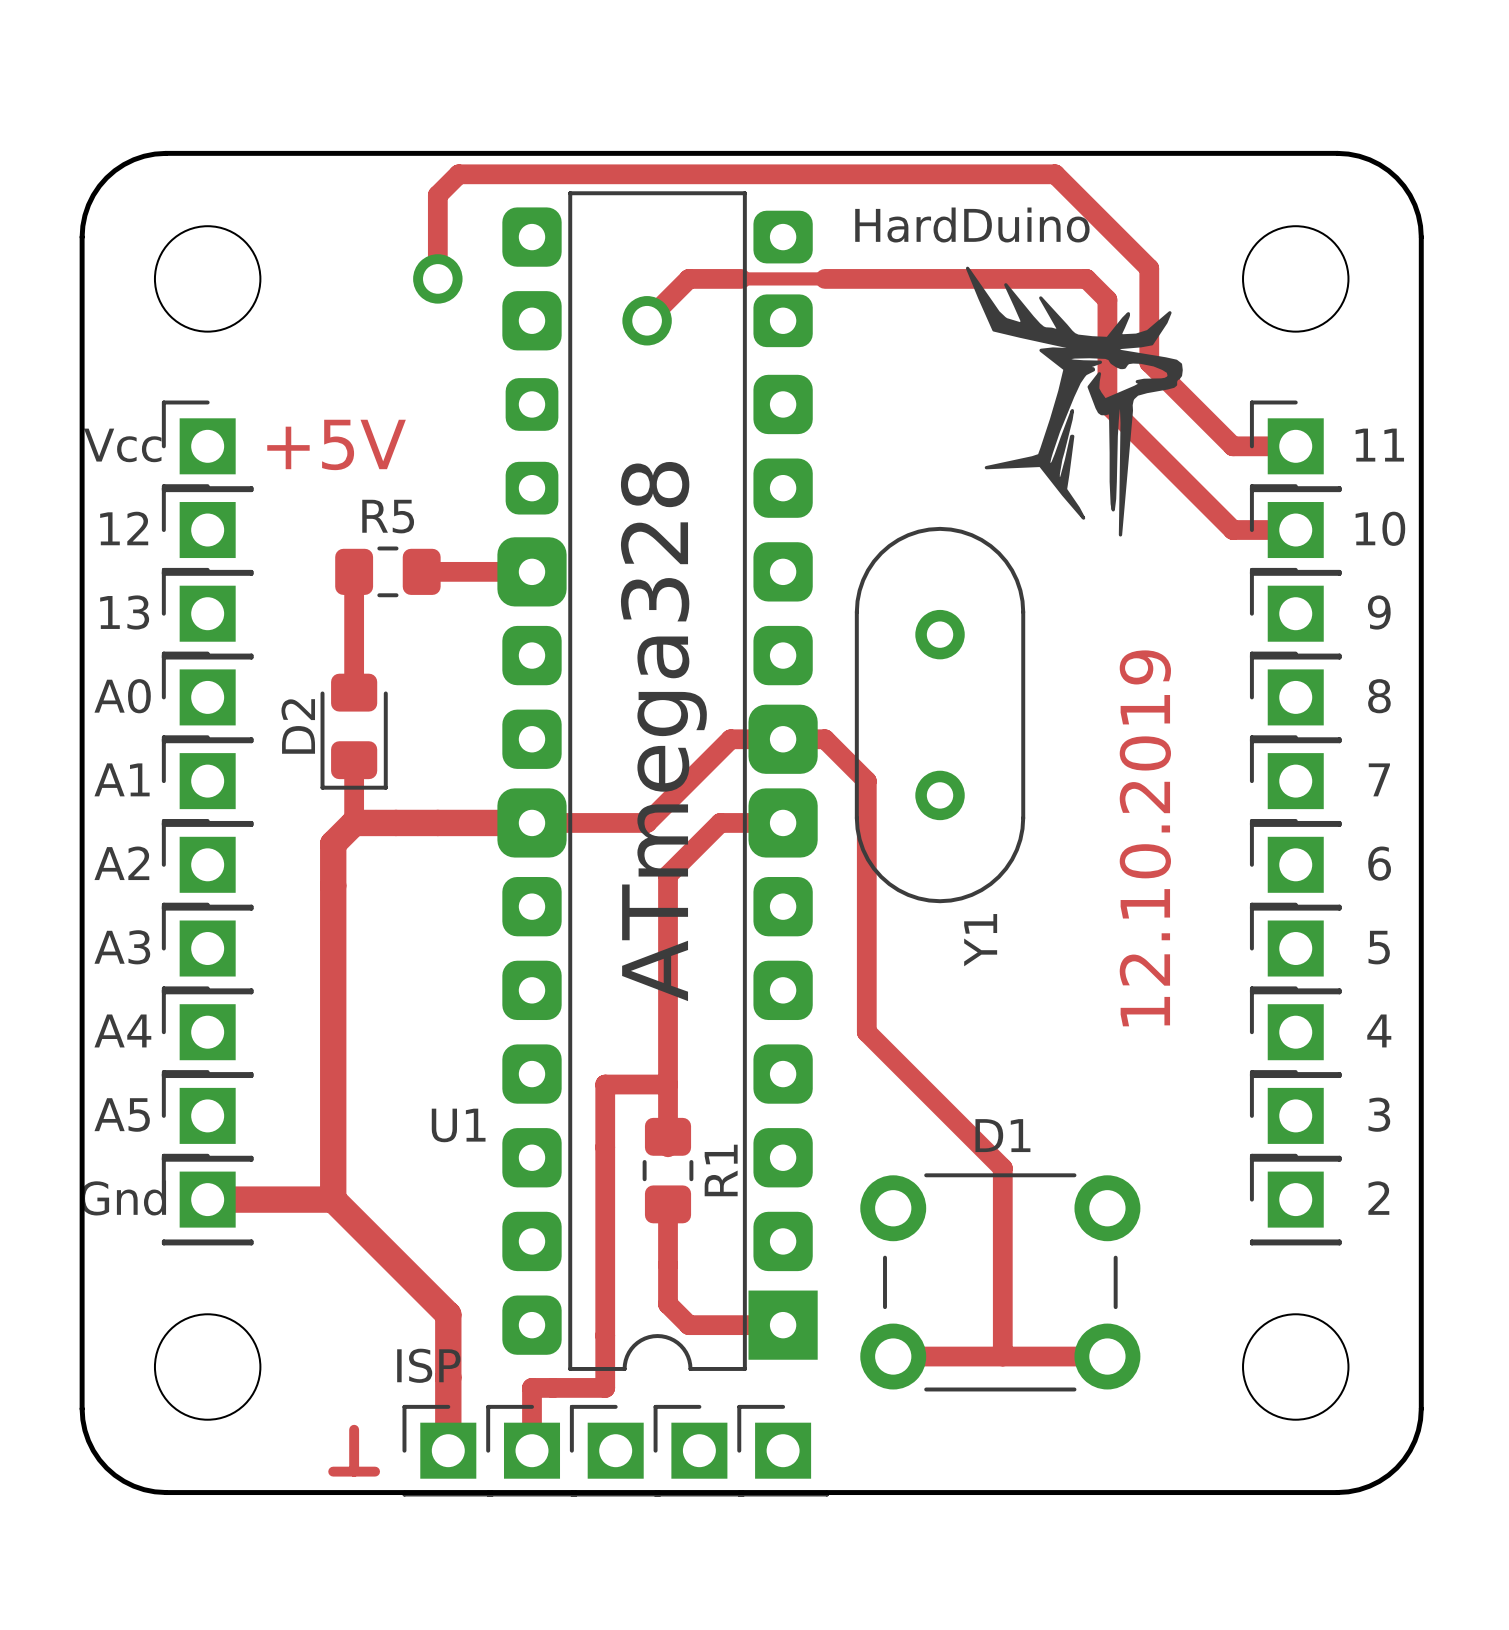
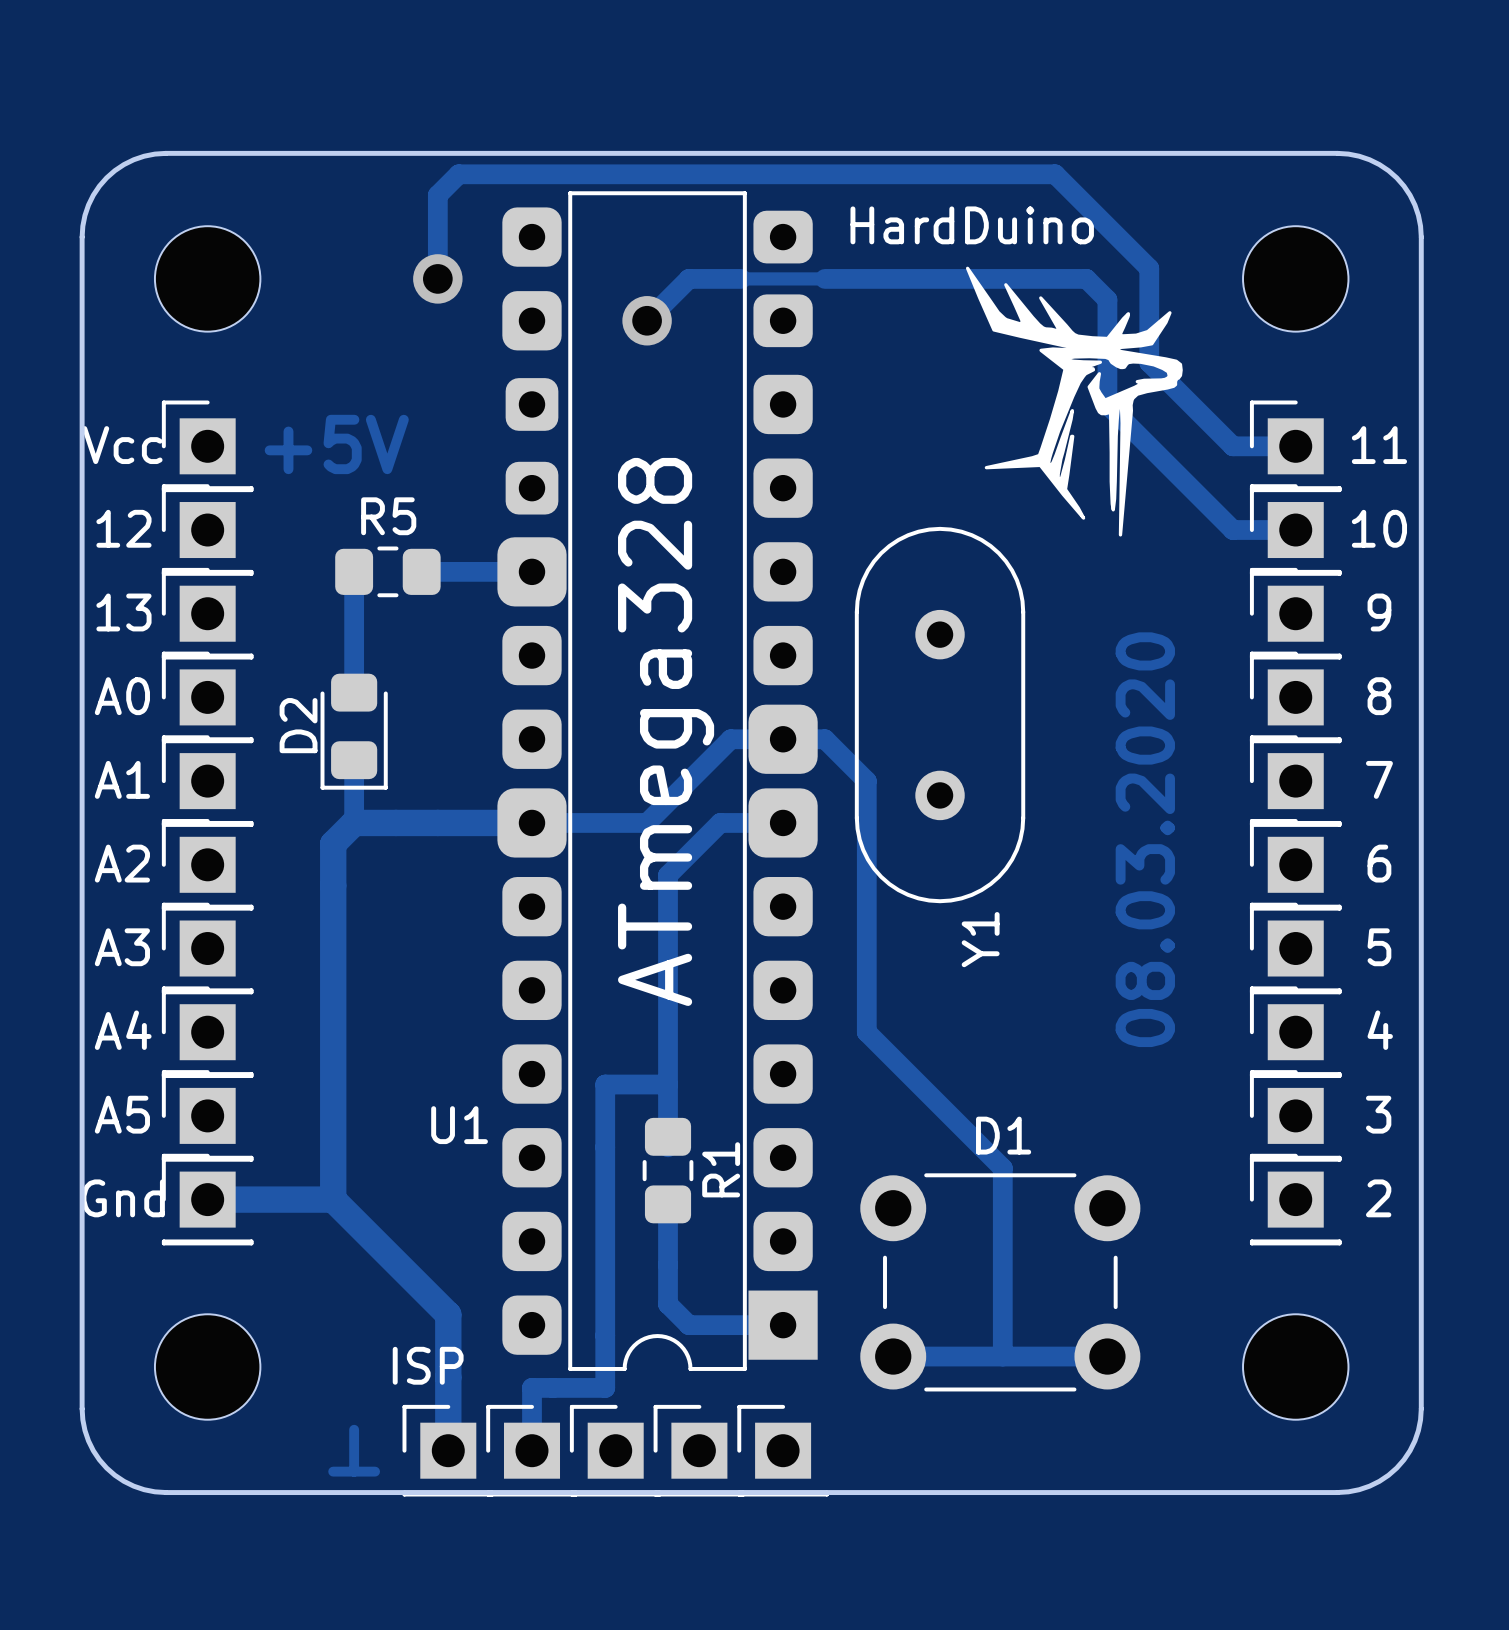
text: 12.10.2019 (1145, 838) -> 08.03.2020 (1145, 839)

